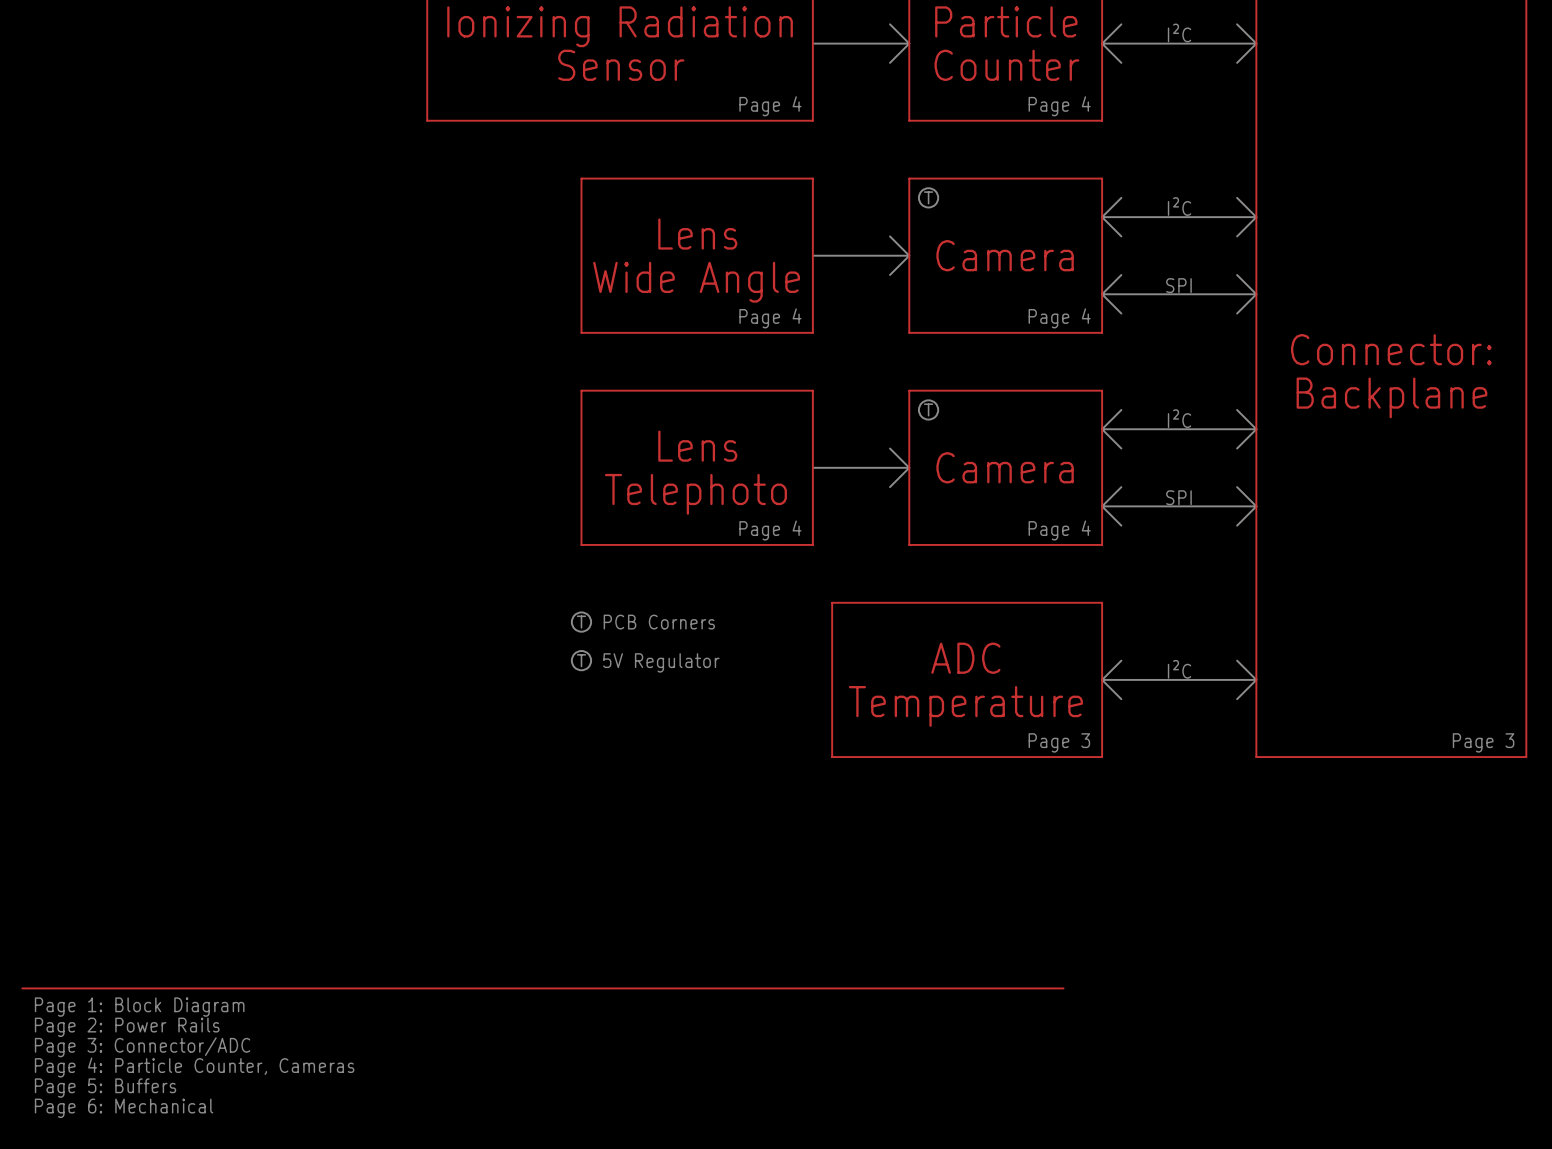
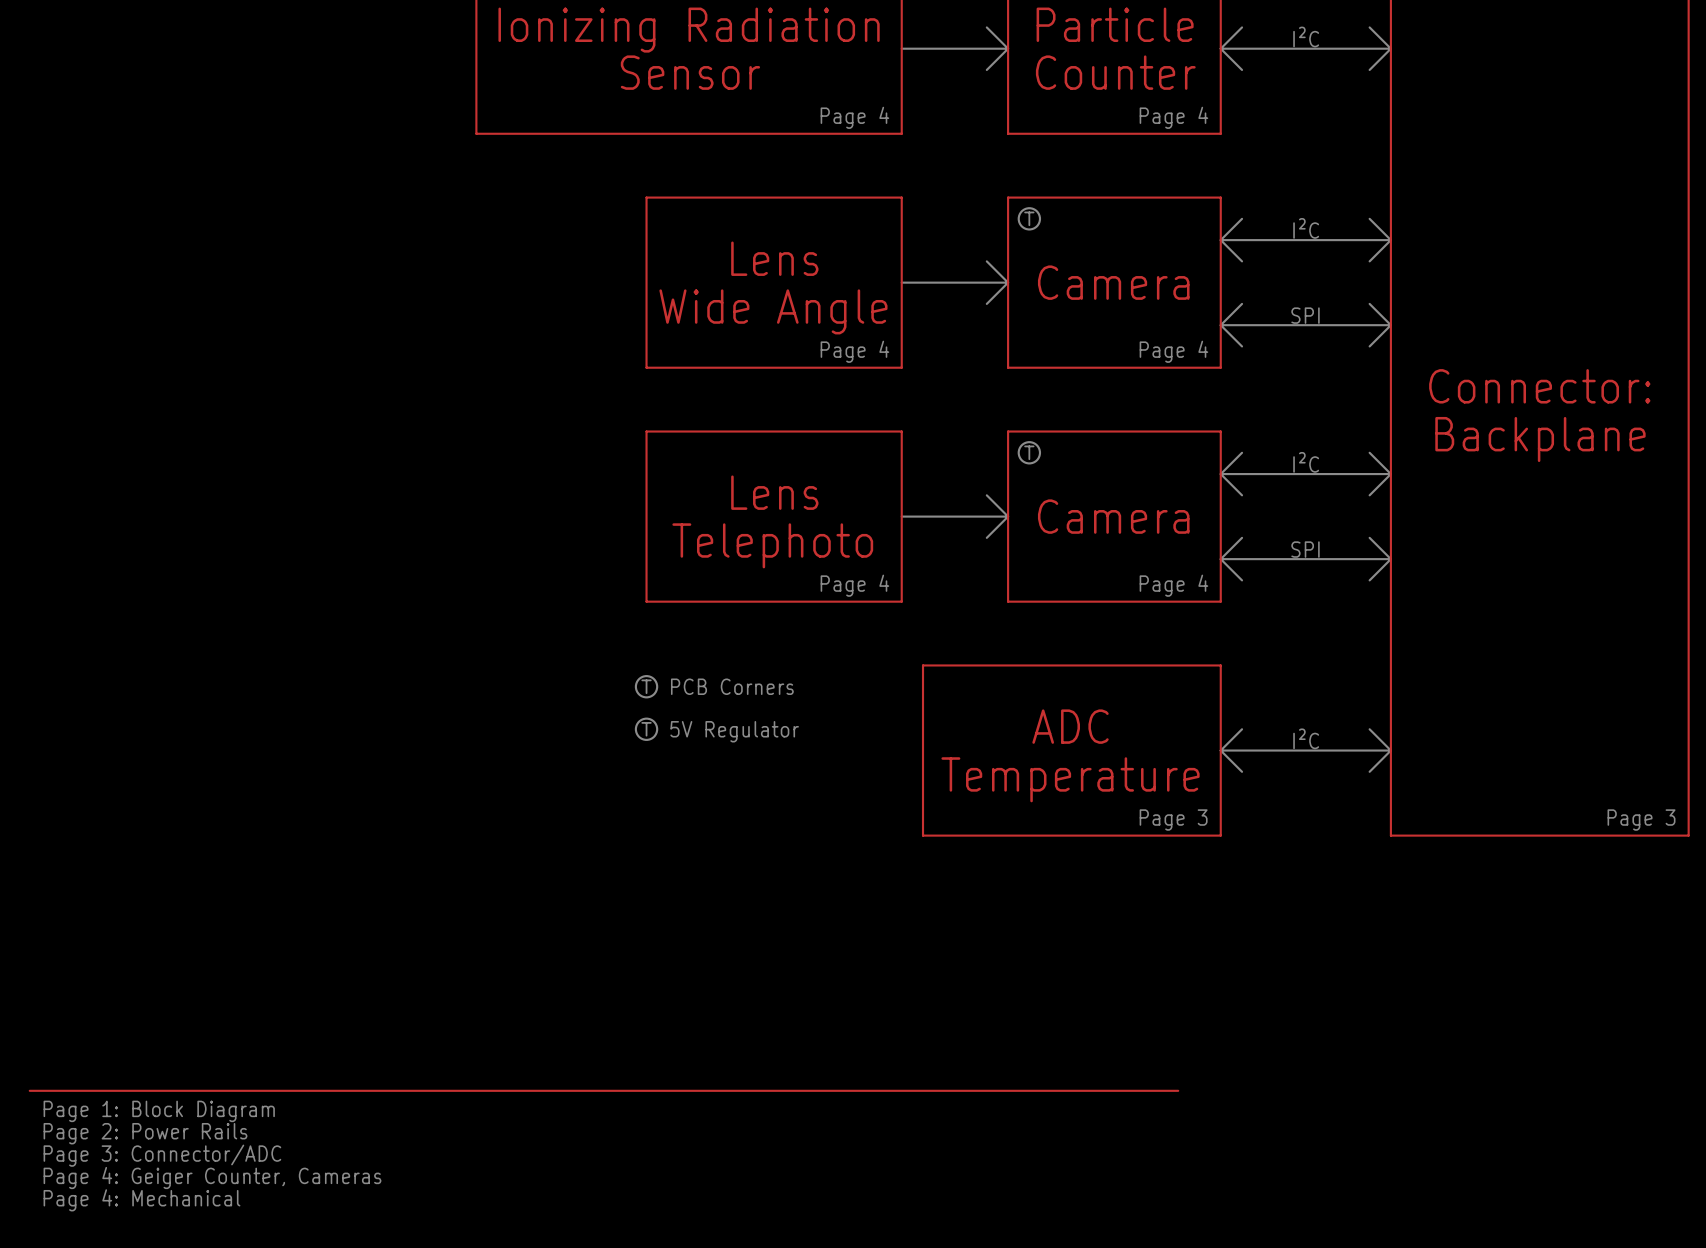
text: Page 4: Particle Counter, Cameras (194, 1067) -> Page 4: Geiger Counter, Cameras (212, 1178)
text: Page 5: Buffers (105, 1088) -> Page 4: Mechanical (141, 1200)
text: Page 6: Mechanical (124, 1108) -> none

